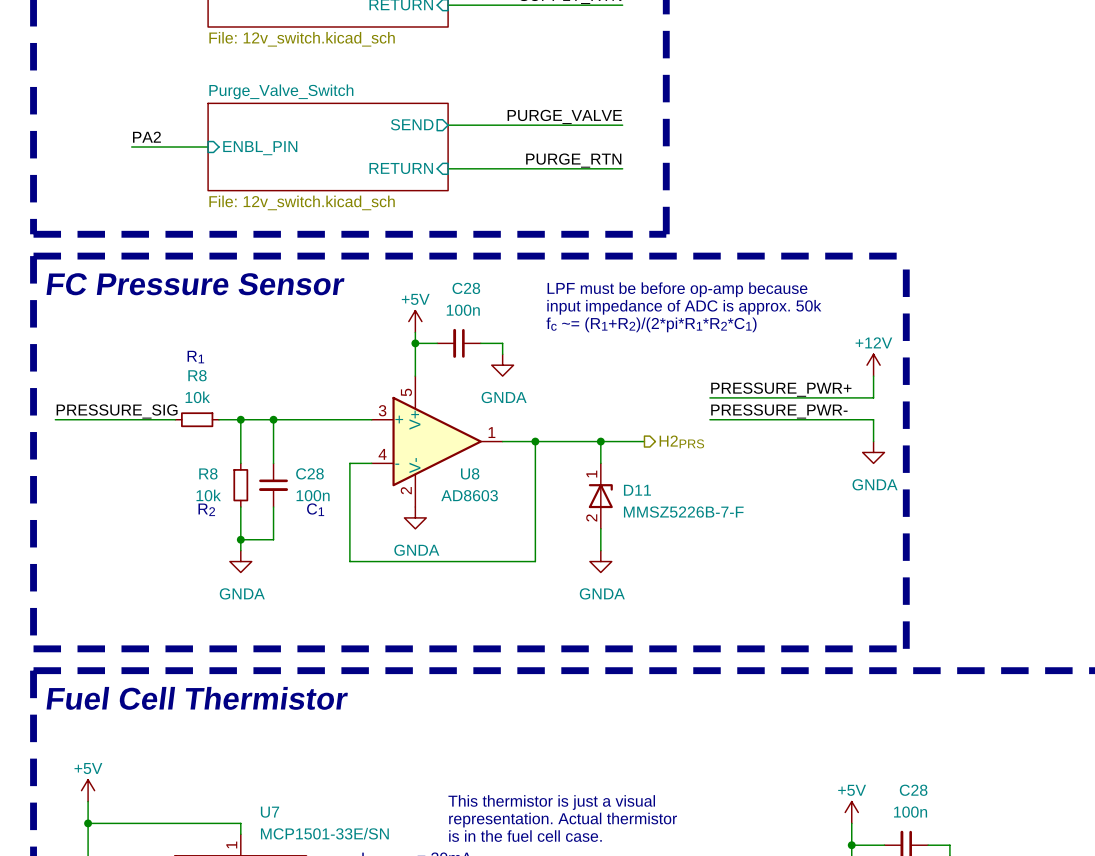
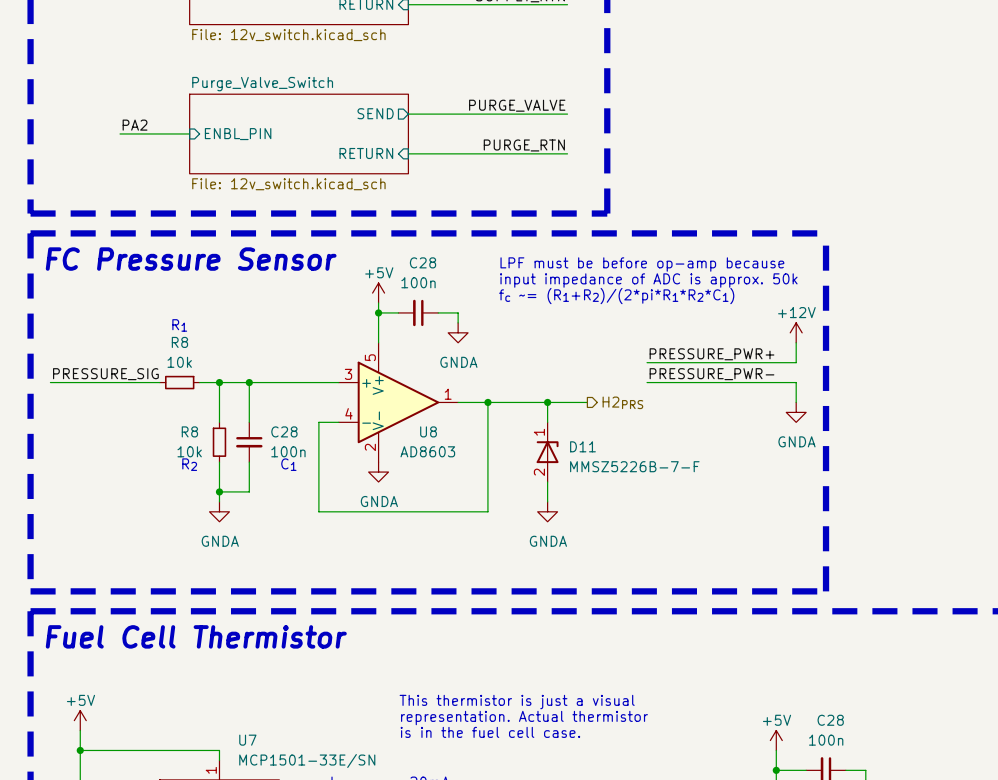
text position: This thermistor is just a visual (551, 802) -> This thermistor is just a visual (517, 702)
text position: representation. Actual thermistor (563, 820) -> representation. Actual thermistor (524, 718)
text position: is in the fuel cell case. (525, 836) -> is in the fuel cell case. (490, 732)

